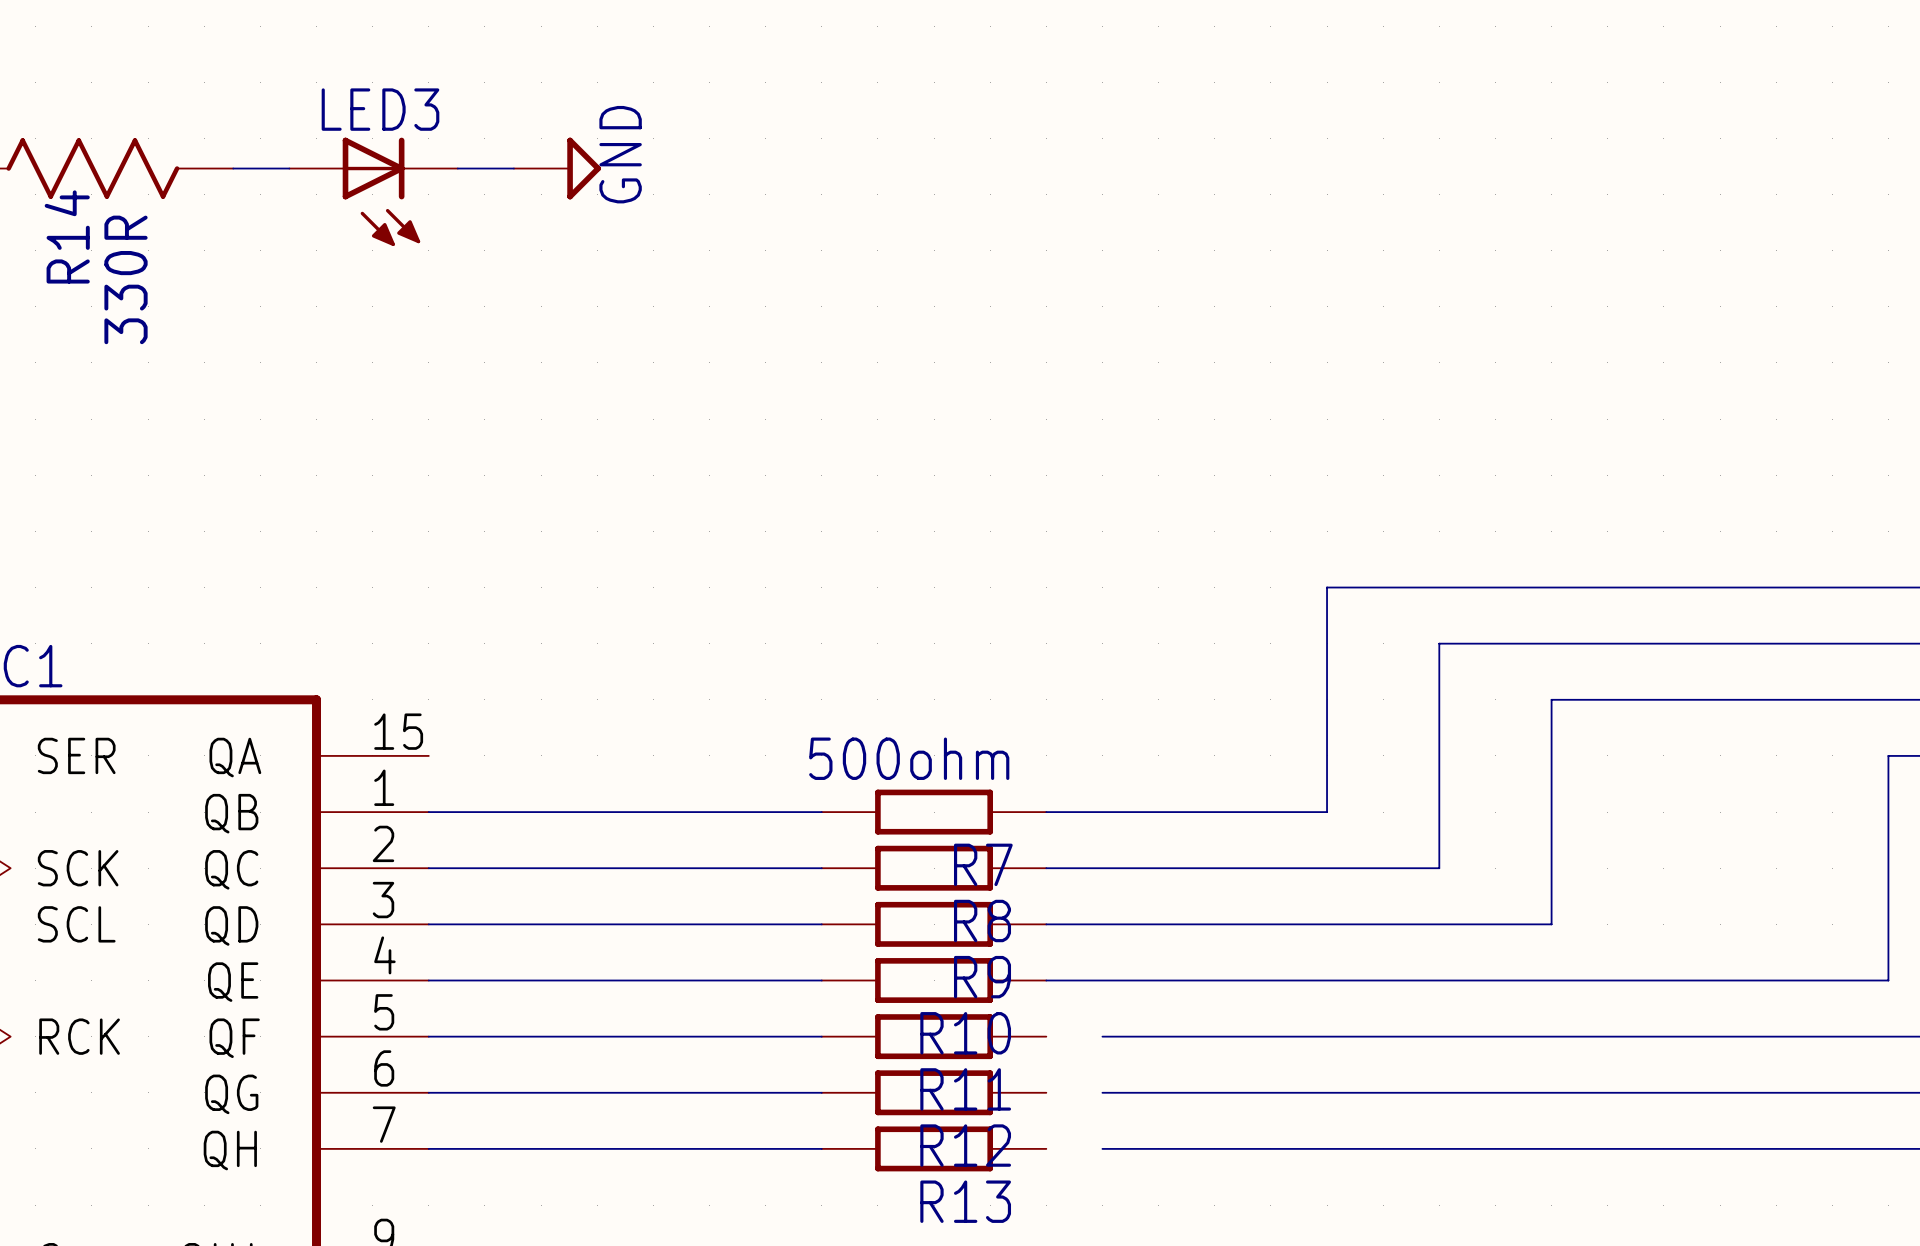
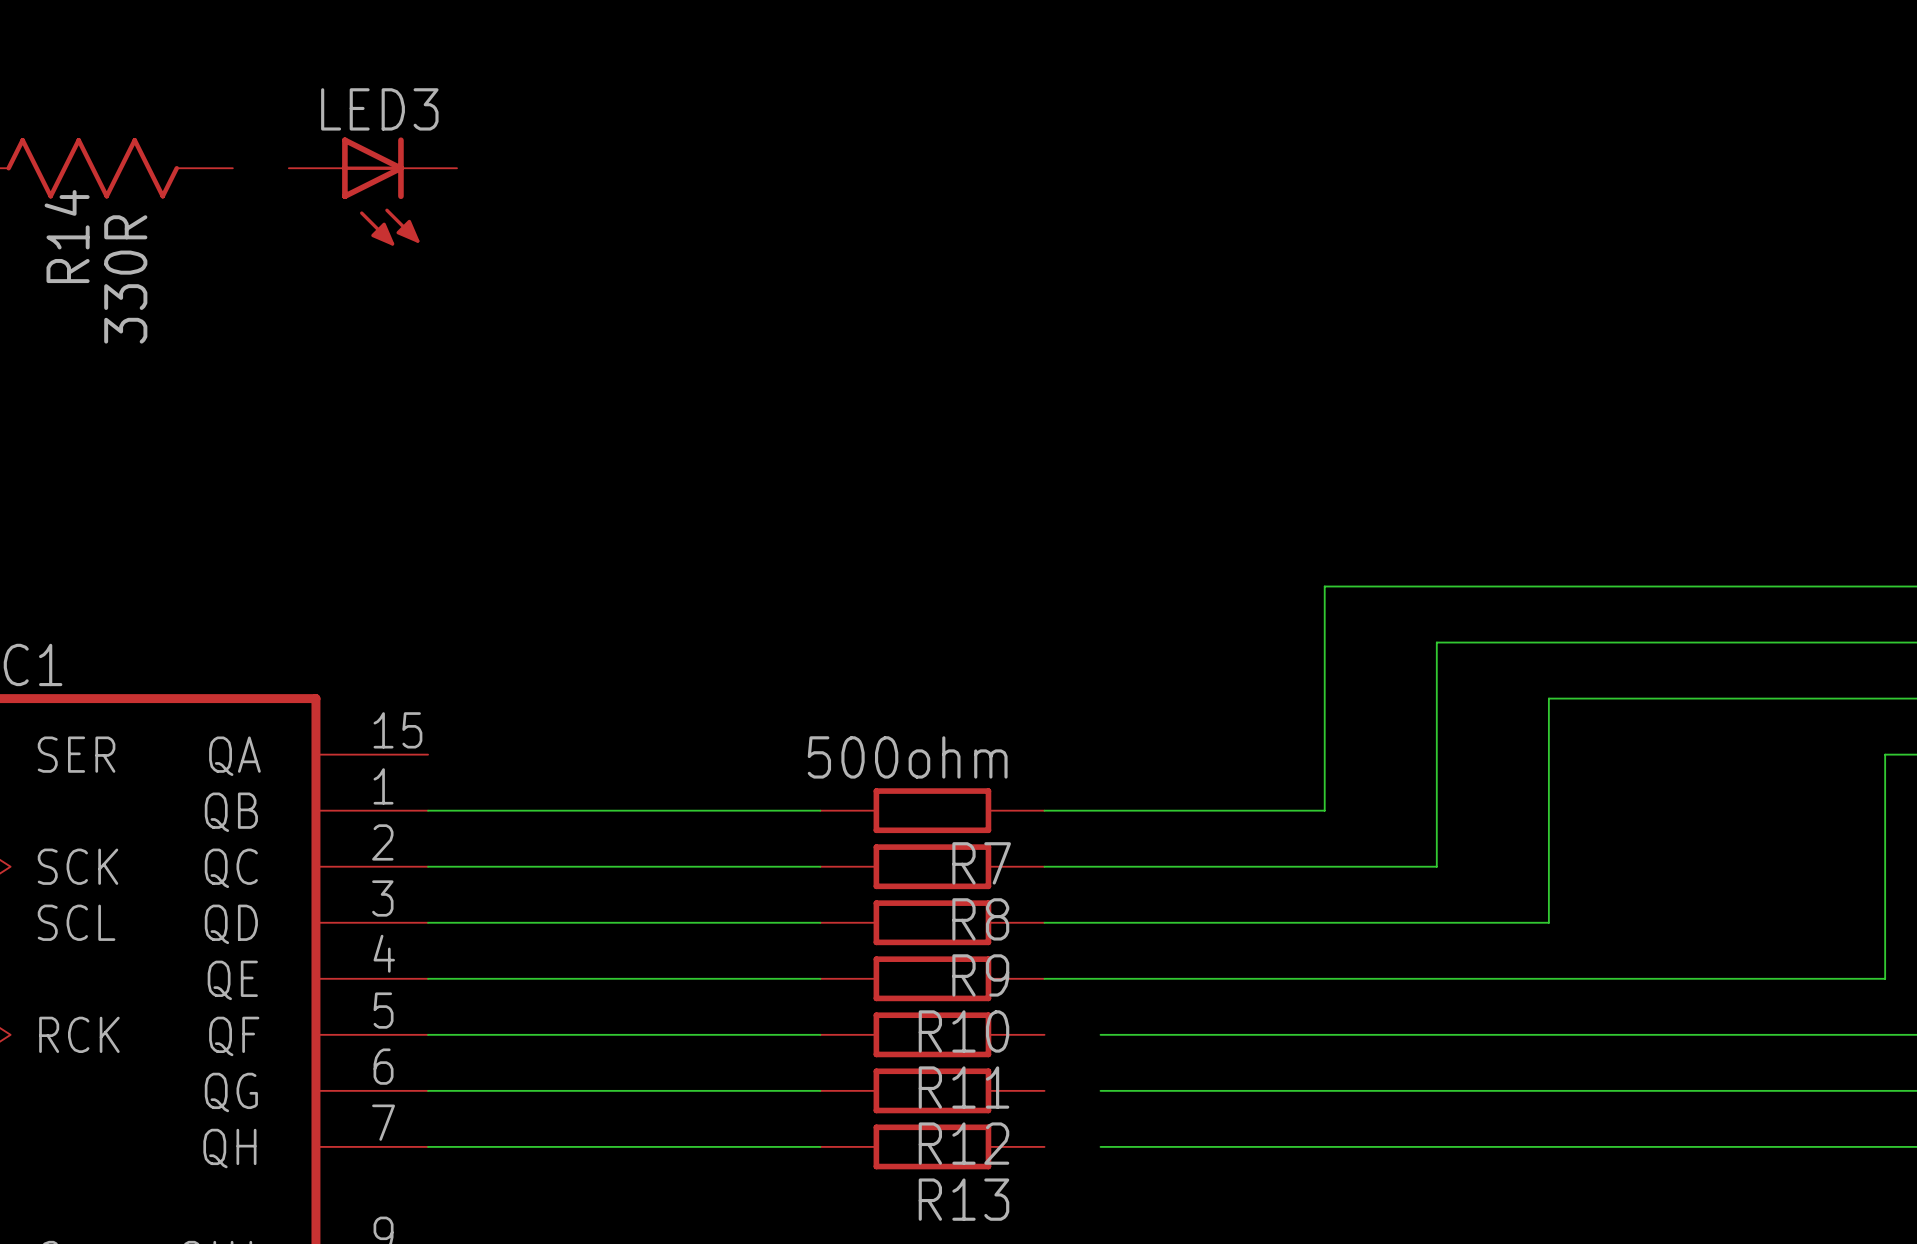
wire: (233, 168) (289, 168) -> none
wire: (457, 168) (513, 168) -> none
power symbol: GND (557, 168) -> none

